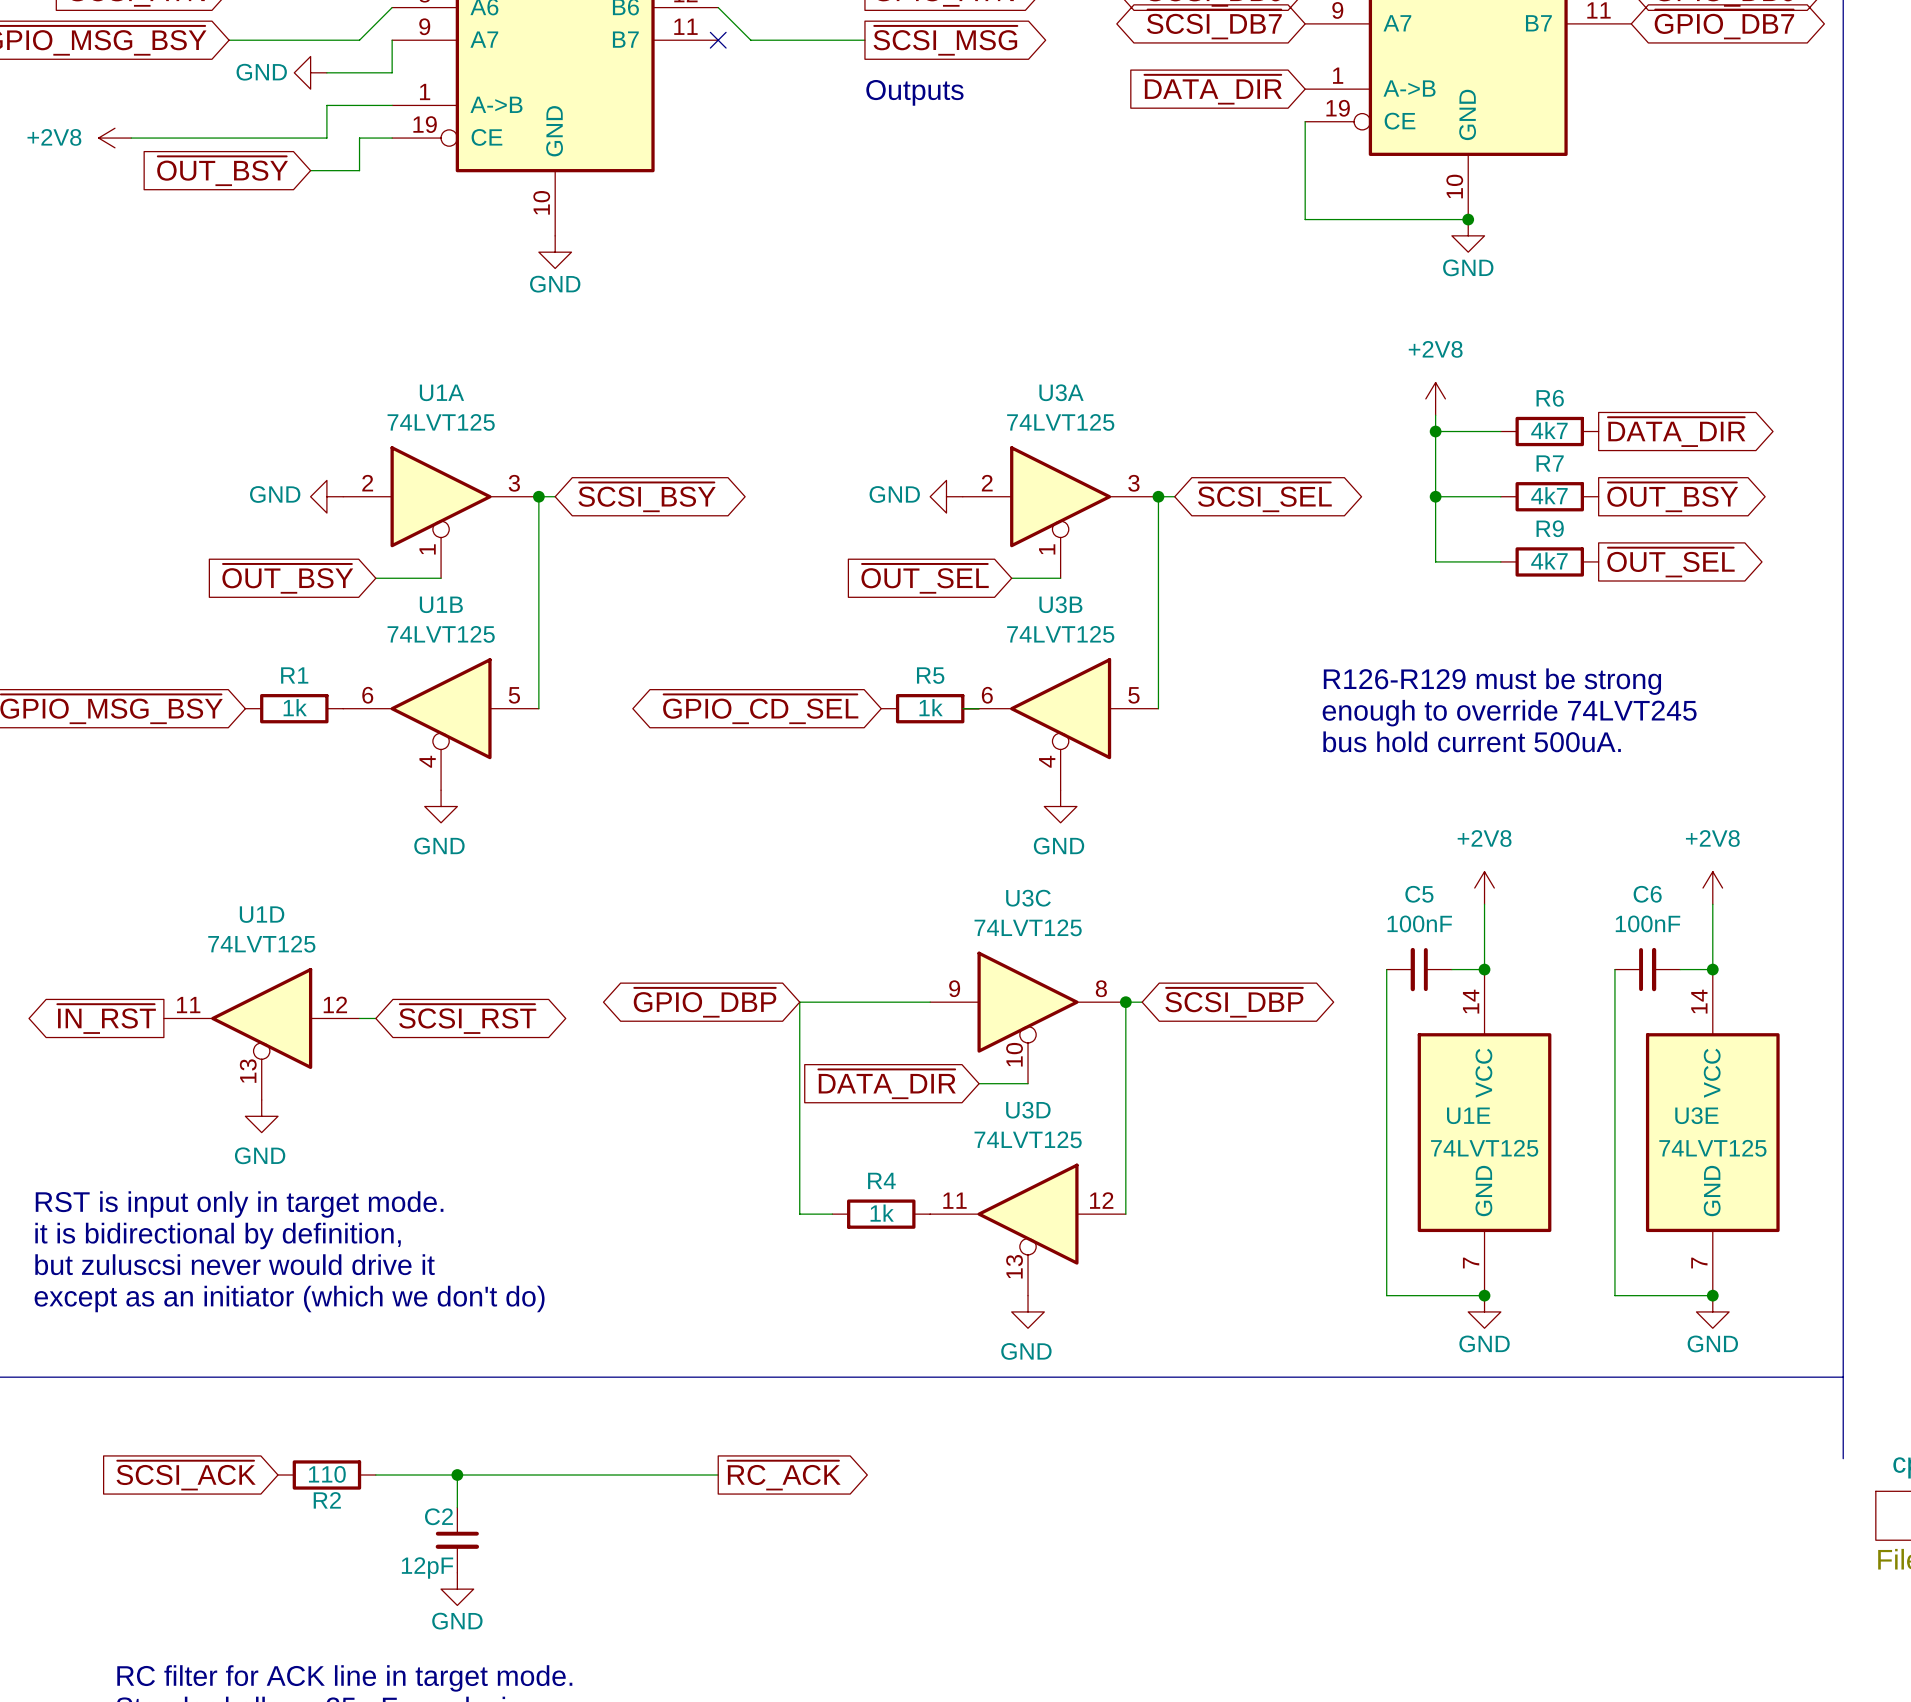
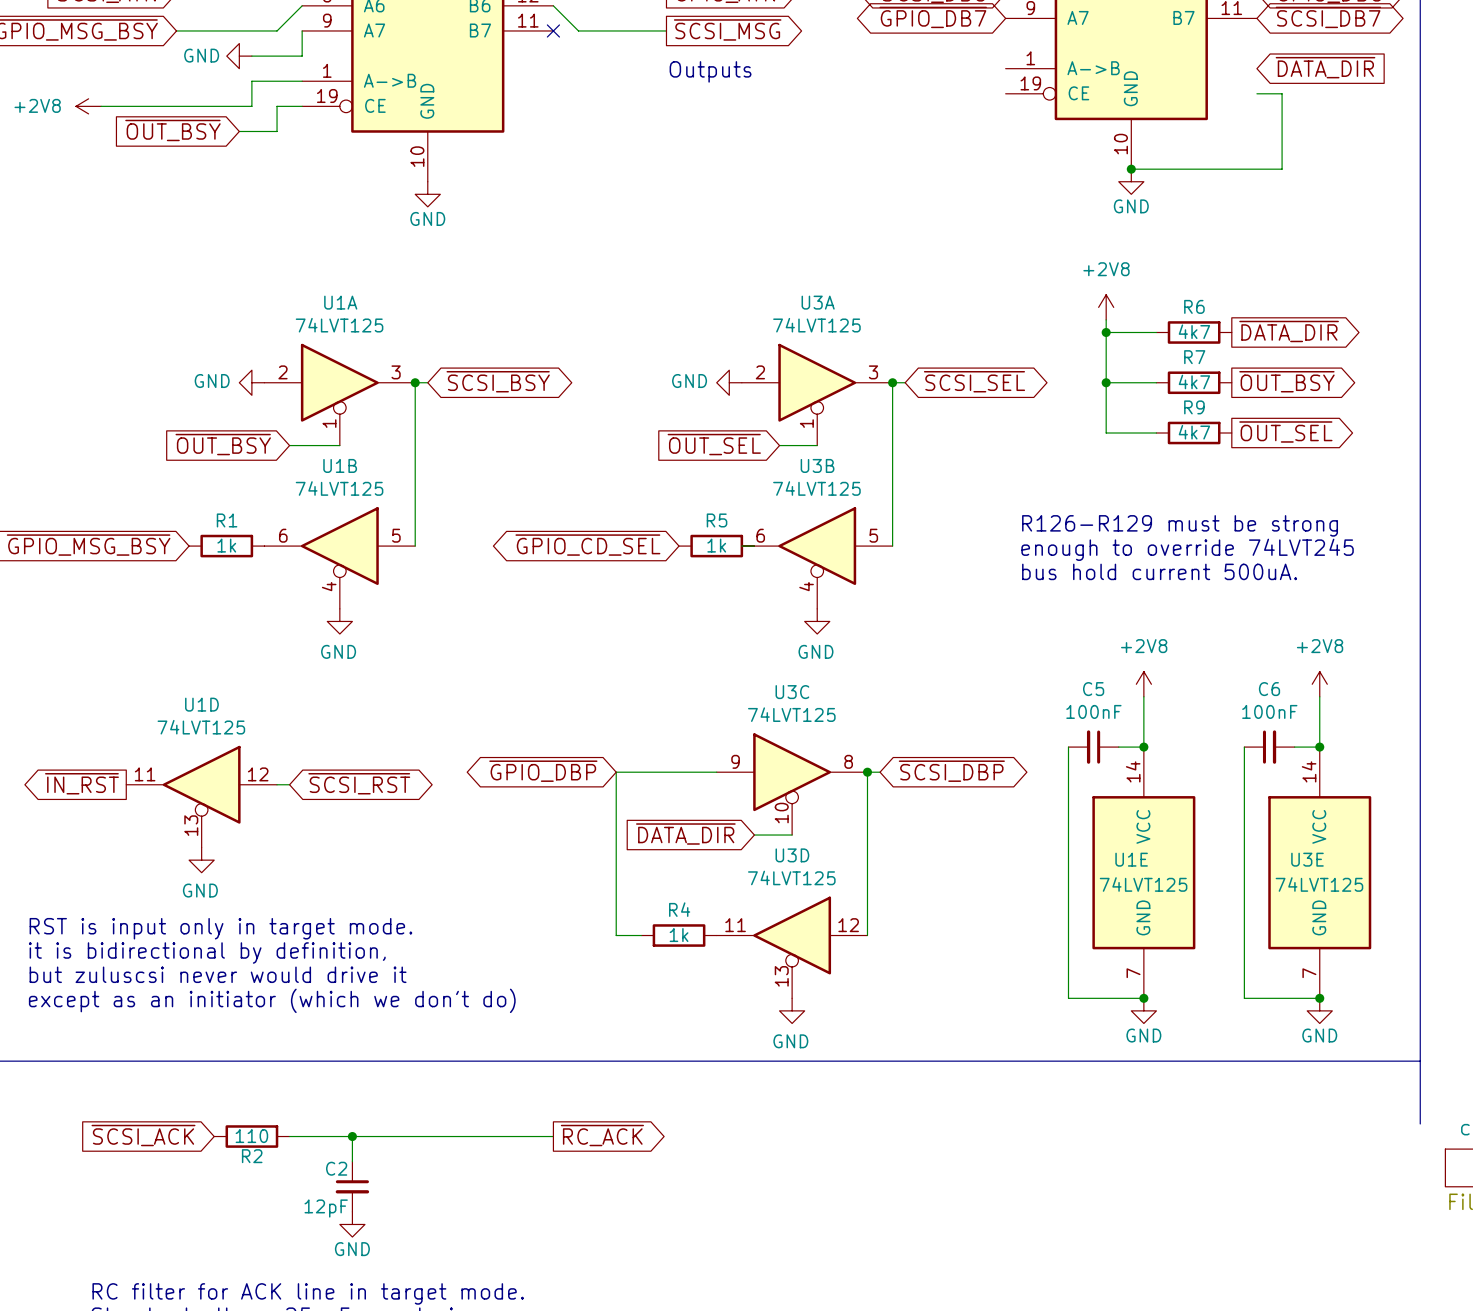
global label: ~{SCSI_DB7} (1214, 24) -> ~{GPIO_DB7} (933, 17)
global label: ~{GPIO_DB7} (1724, 24) -> ~{SCSI_DB7} (1328, 17)
global label: ~{DATA_DIR} (1213, 89) -> none
global label: none -> ~{DATA_DIR} (1325, 67)
wire: (1305, 121) (1305, 219) (1468, 219) -> (1256, 93) (1282, 93) (1282, 169) (1131, 169)

